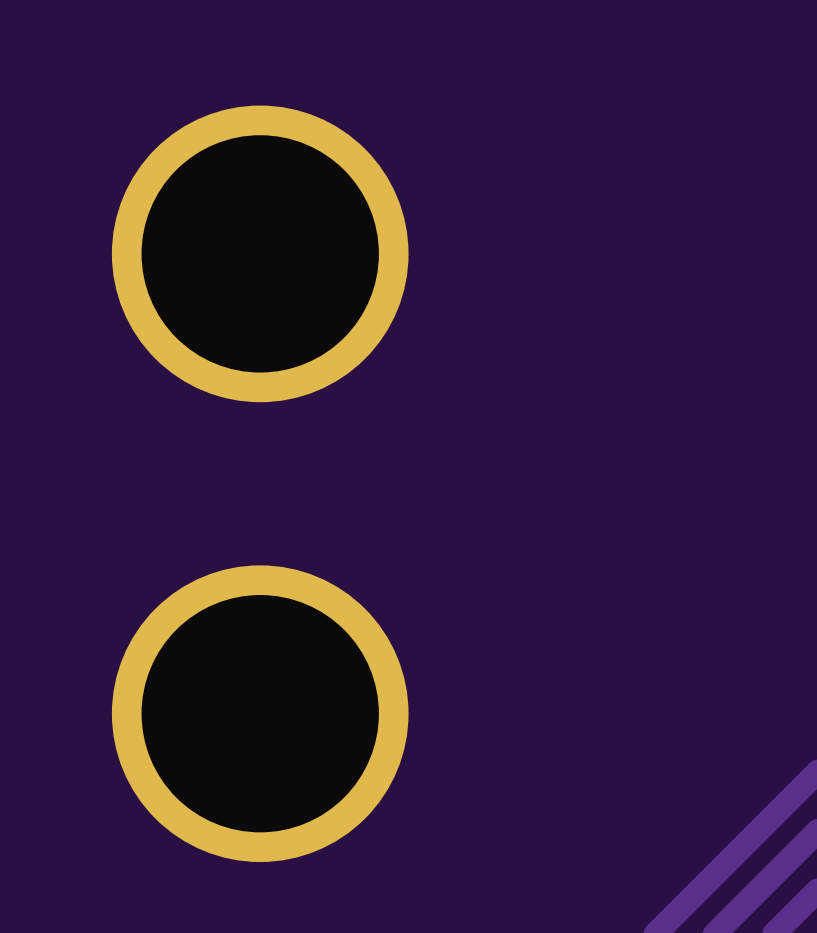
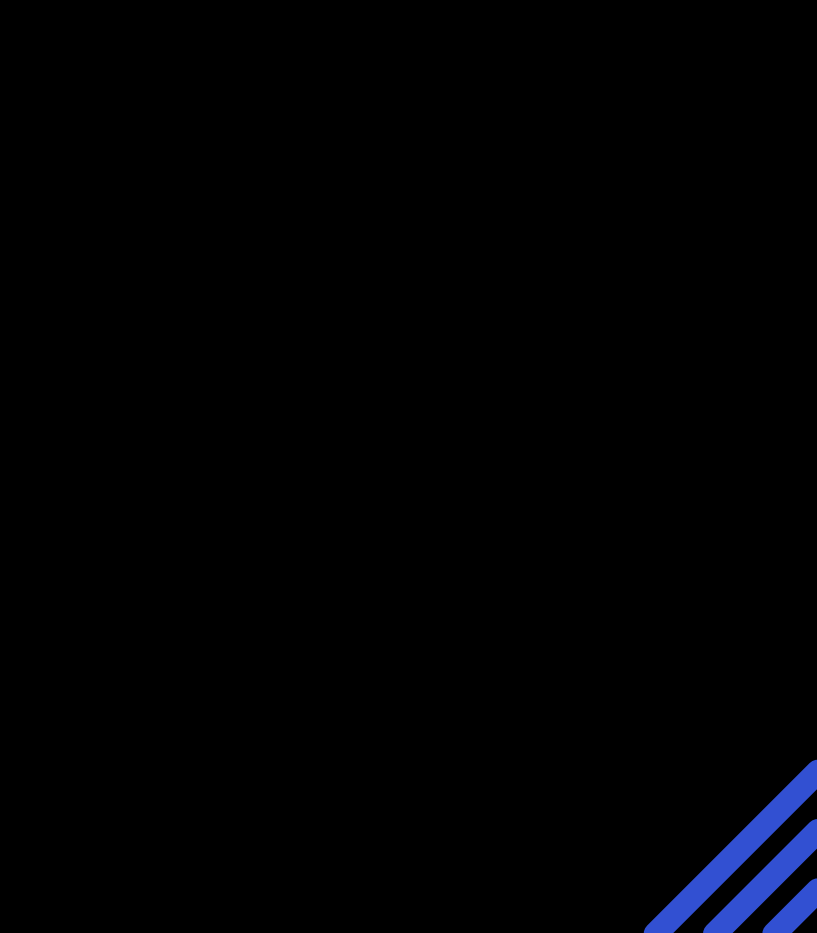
part: (260, 253) -> none
part: (260, 713) -> none

